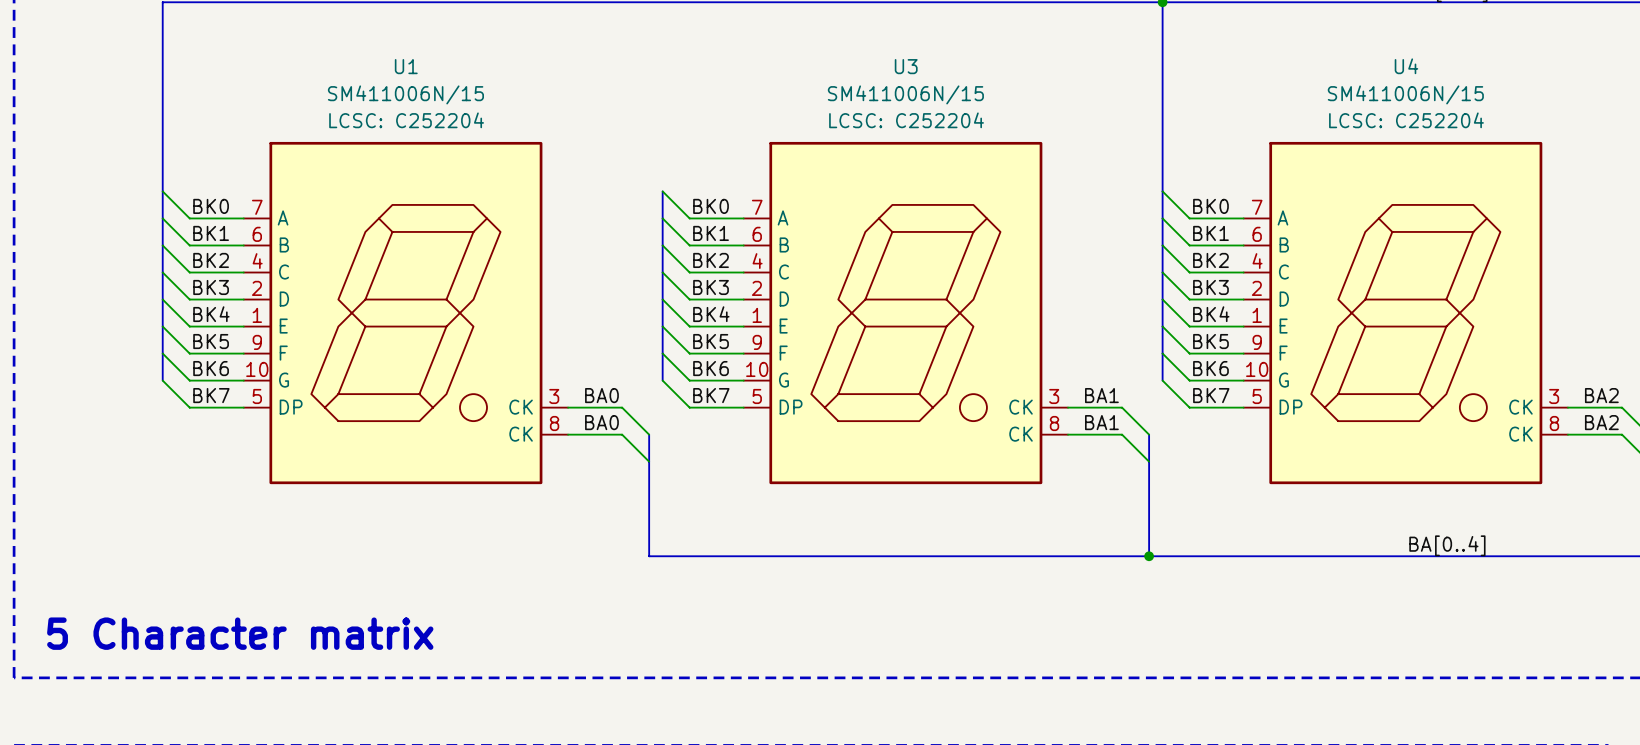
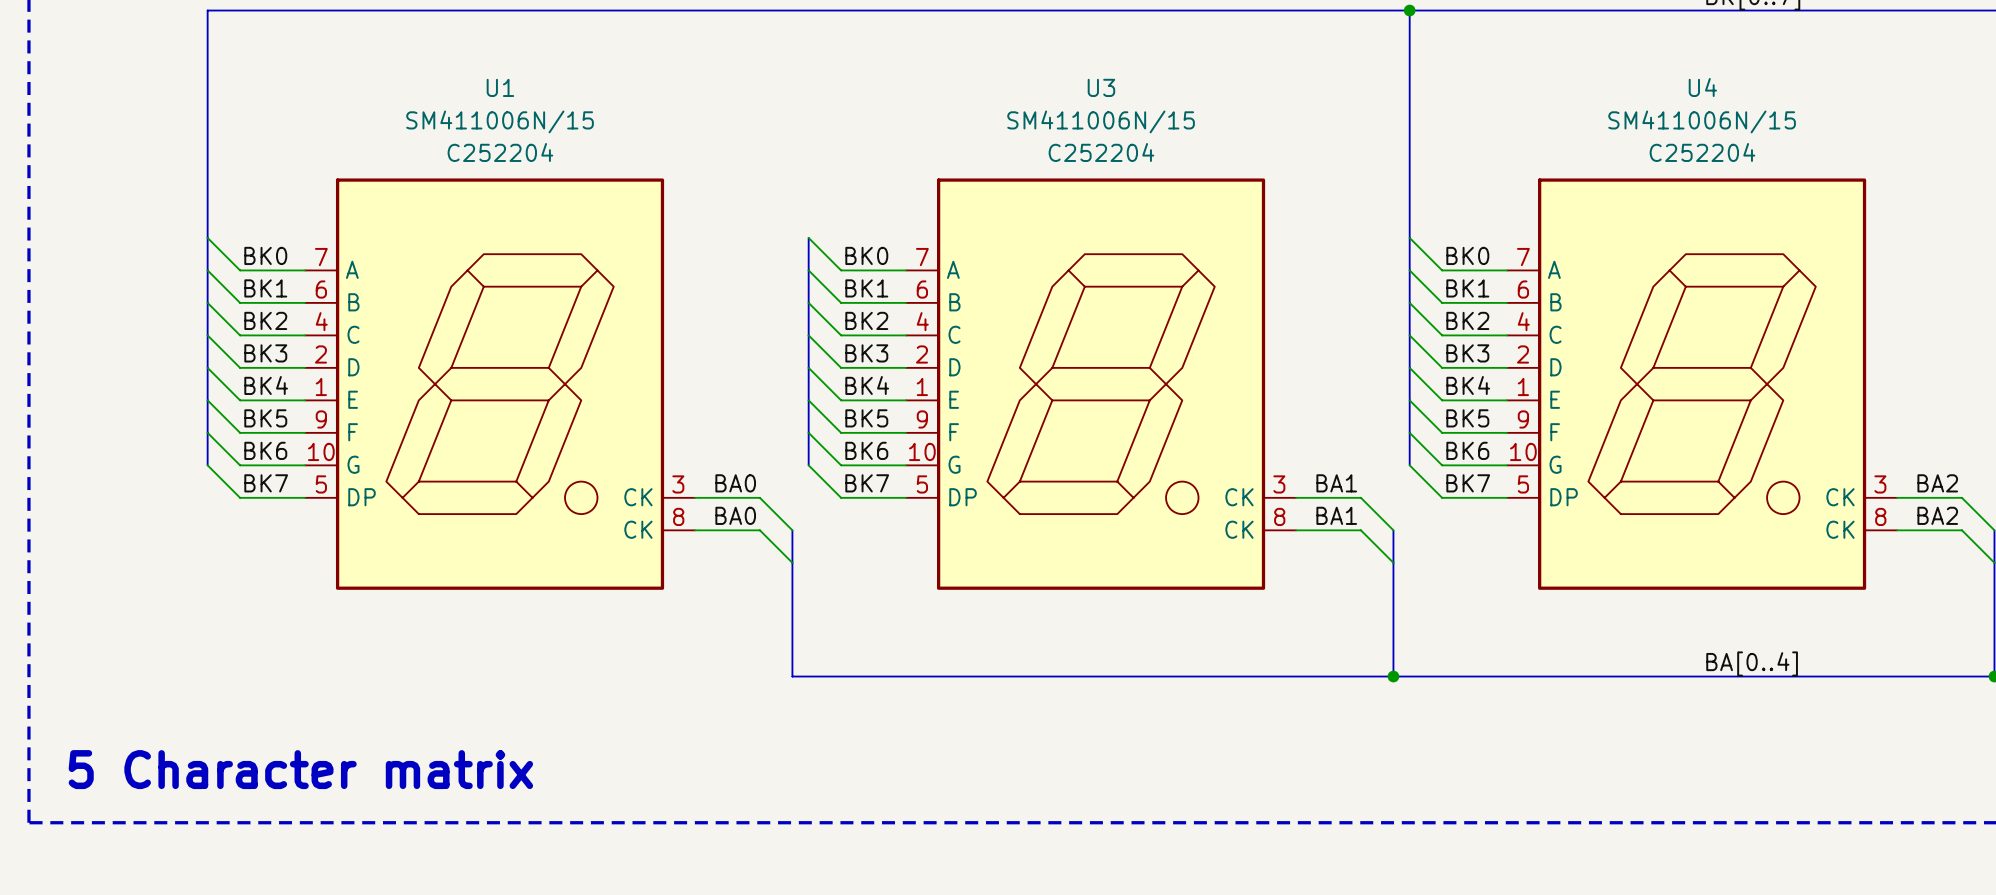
U1 text: LCSC: C252204 (406, 120) -> C252204 (500, 152)
U3 text: LCSC: C252204 (906, 120) -> C252204 (1101, 152)
U4 text: LCSC: C252204 (1406, 120) -> C252204 (1702, 152)

